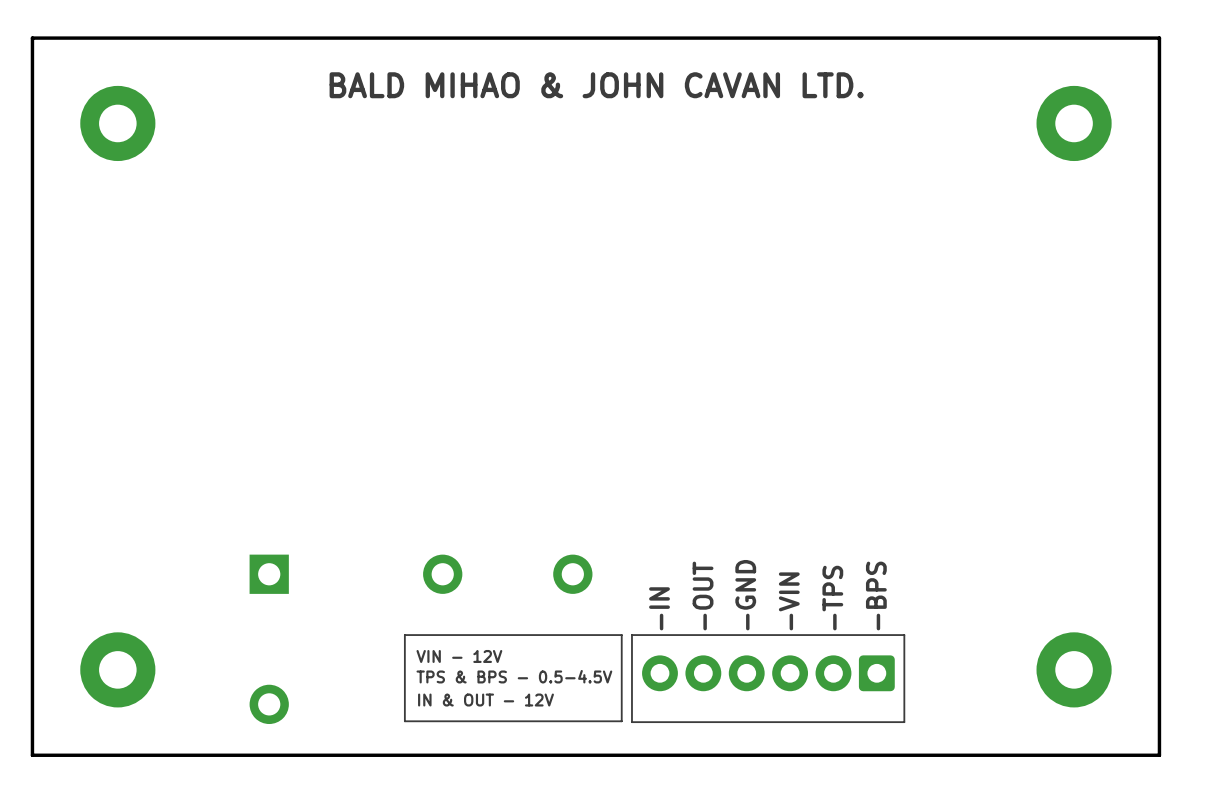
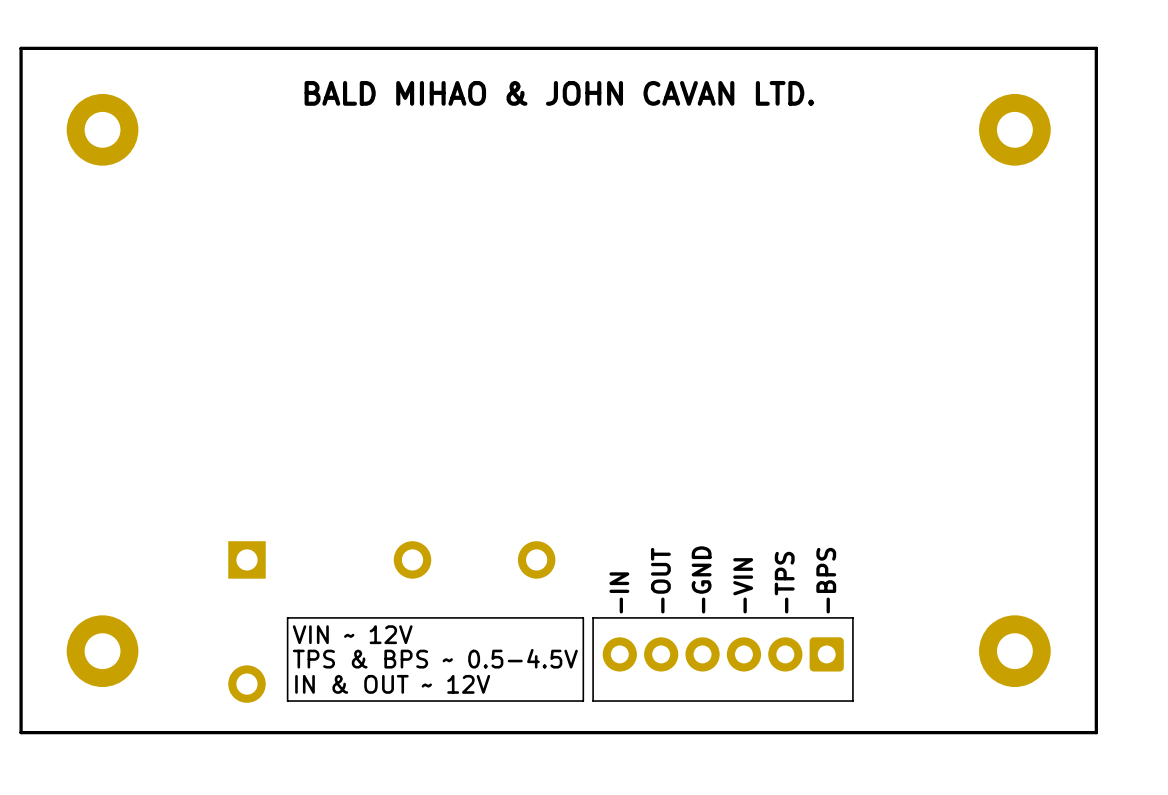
line: (404, 635) (404, 721) (621, 721) -> (376, 617) (287, 617) (287, 701) (583, 700)
text: VIN - 12V (459, 656) -> VIN ~ 12V (352, 634)
text: TPS & BPS - 0.5-4.5V (514, 676) -> TPS & BPS ~ 0.5-4.5V (435, 658)
text: IN & OUT - 12V (485, 700) -> IN & OUT ~ 12V (392, 684)

